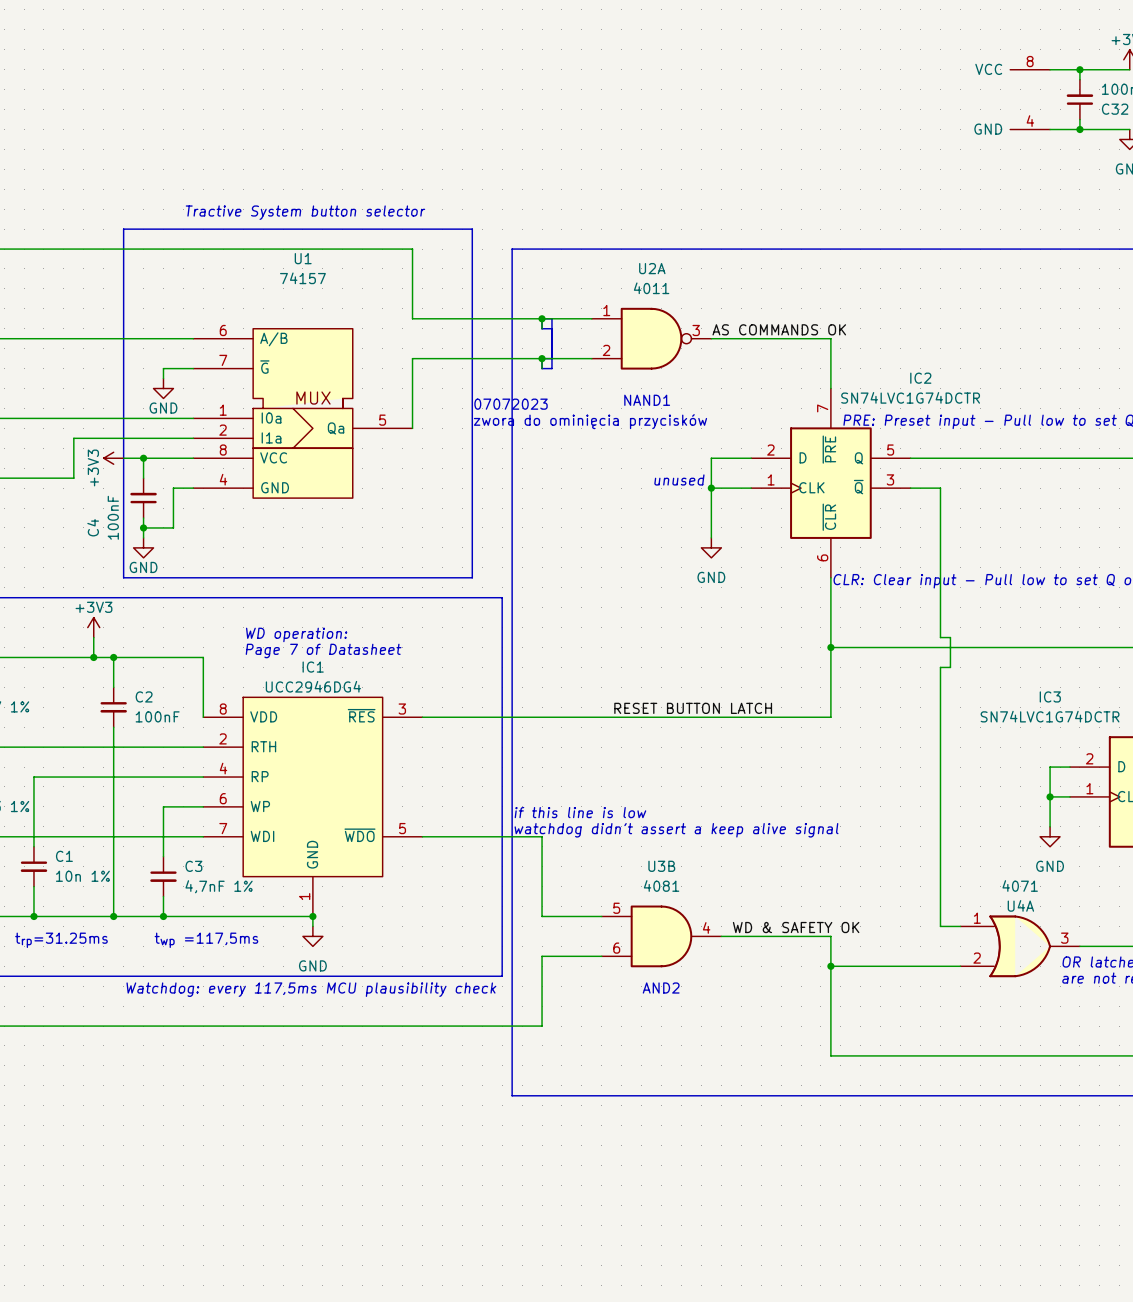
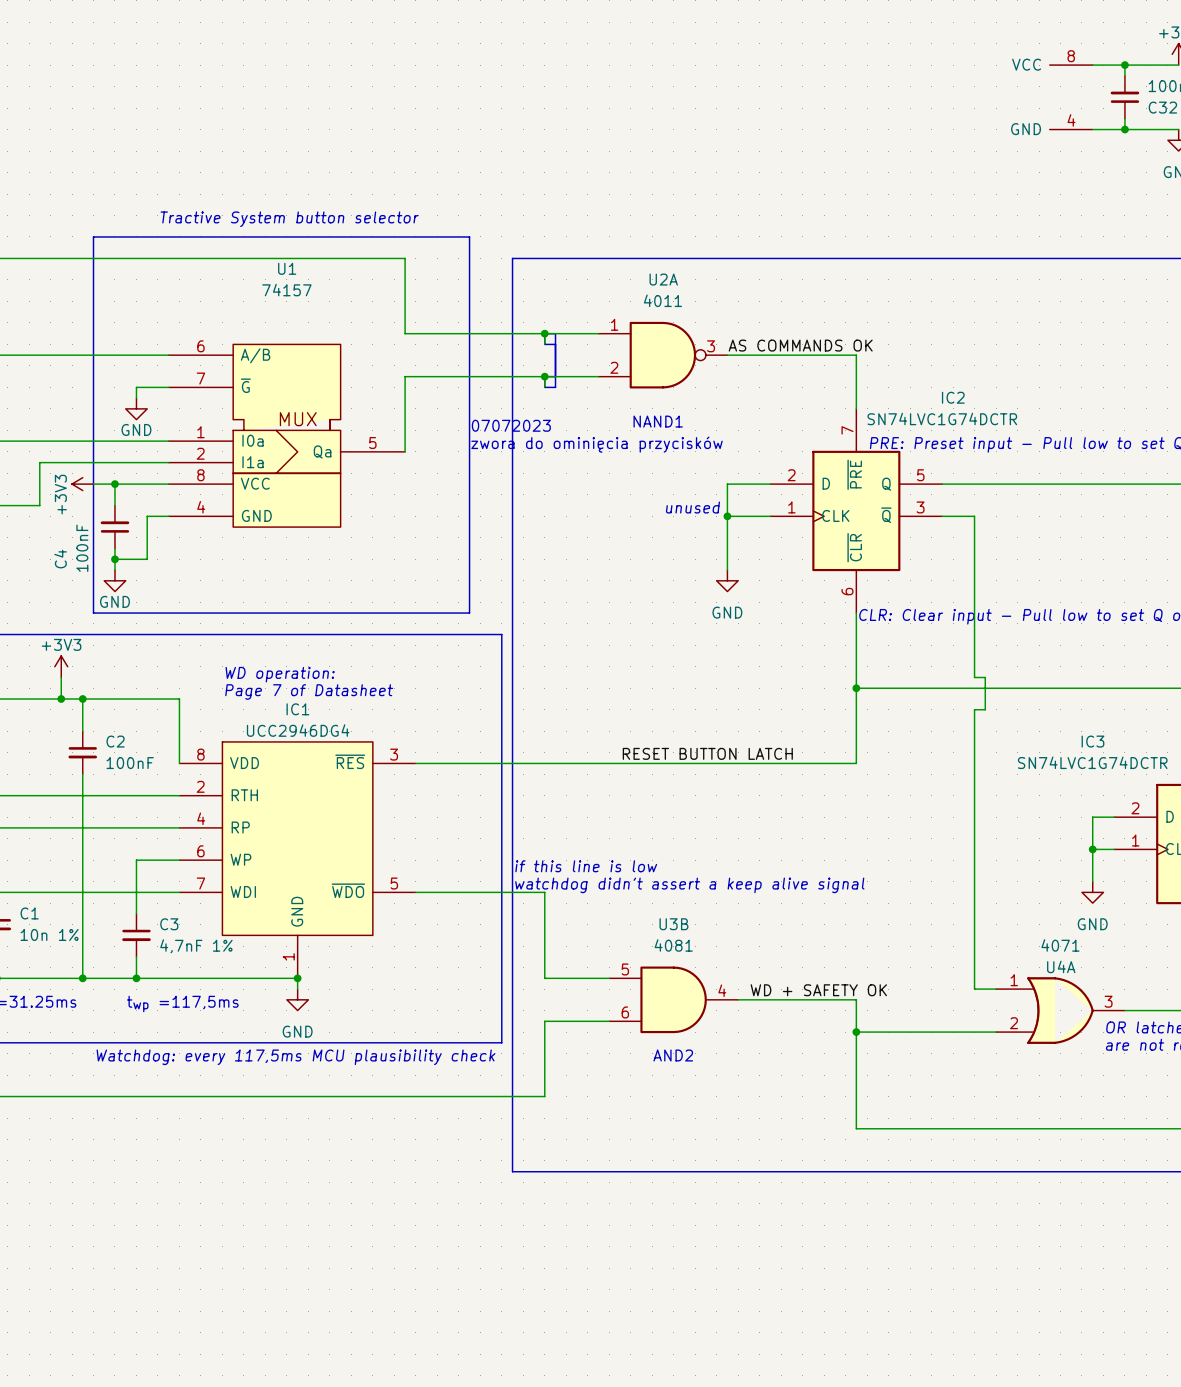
label: WD & SAFETY OK (796, 927) -> WD + SAFETY OK (818, 990)

